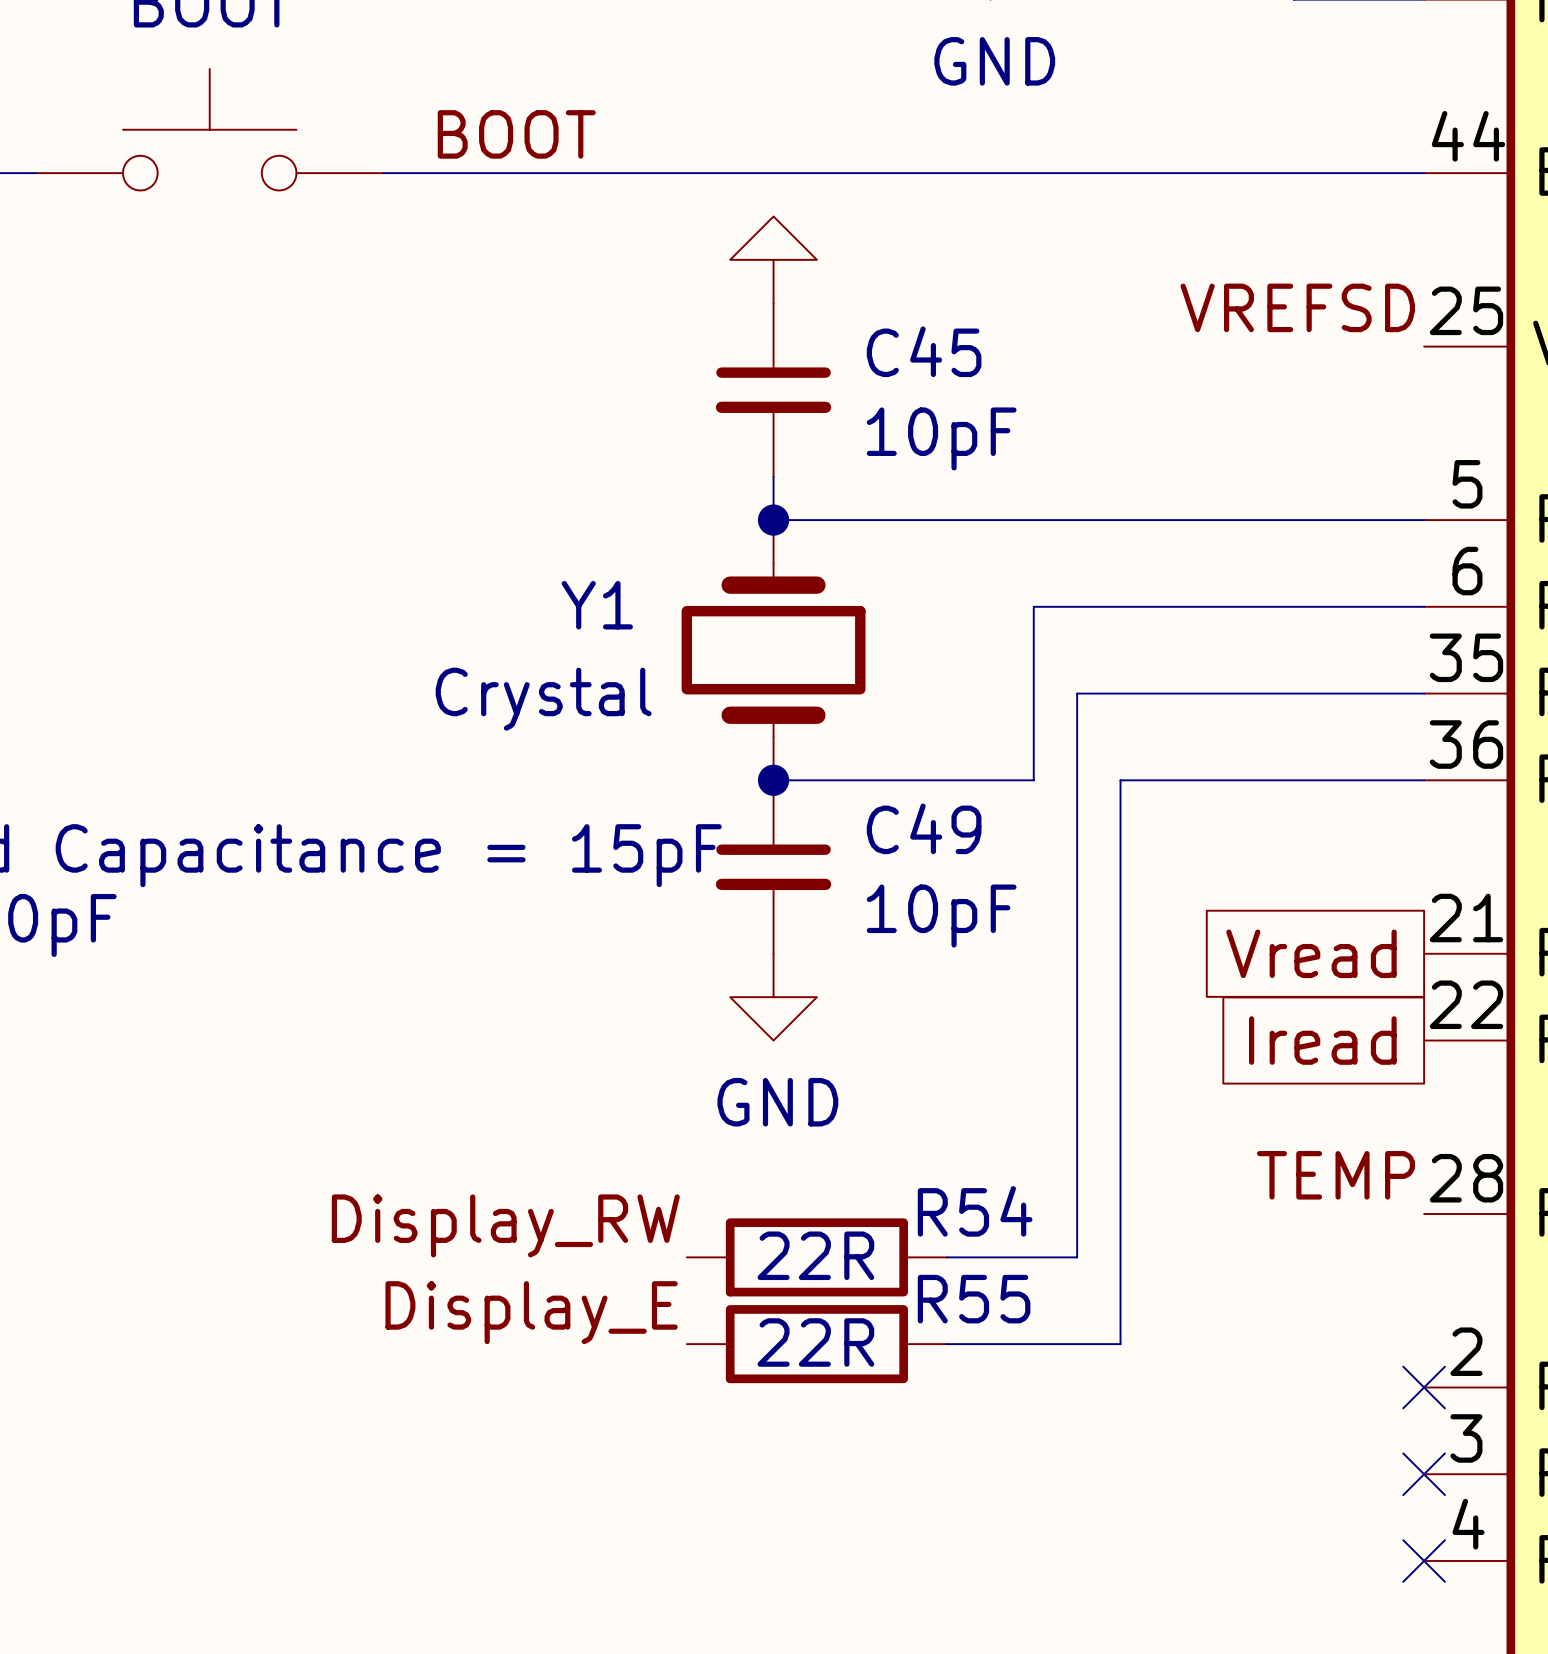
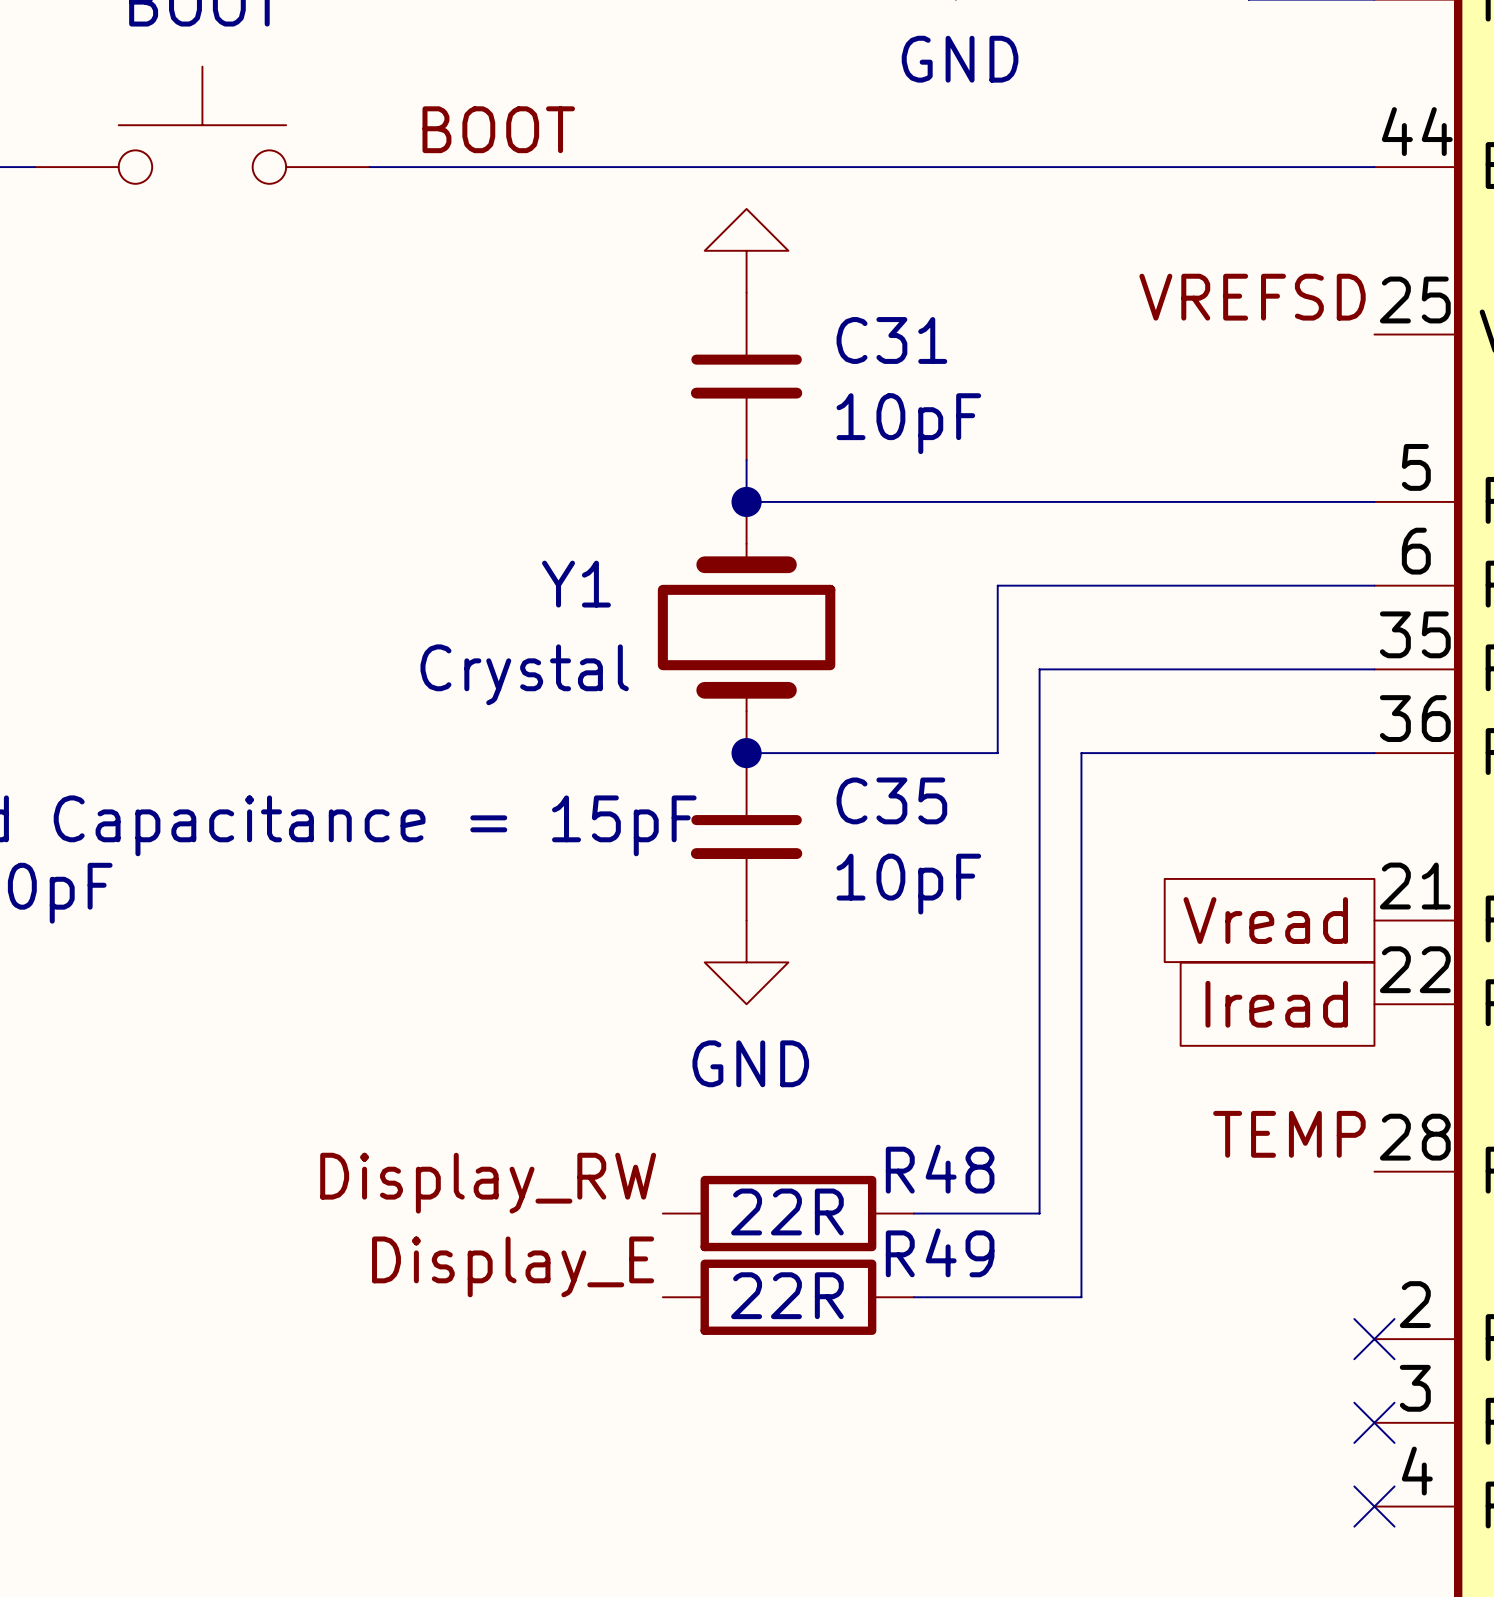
C45 name: C45 (924, 351) -> C31 (891, 340)
C49 name: C49 (924, 828) -> C35 (891, 800)
R54 name: R54 (975, 1211) -> R48 (940, 1169)
R55 name: R55 (974, 1299) -> R49 (940, 1252)

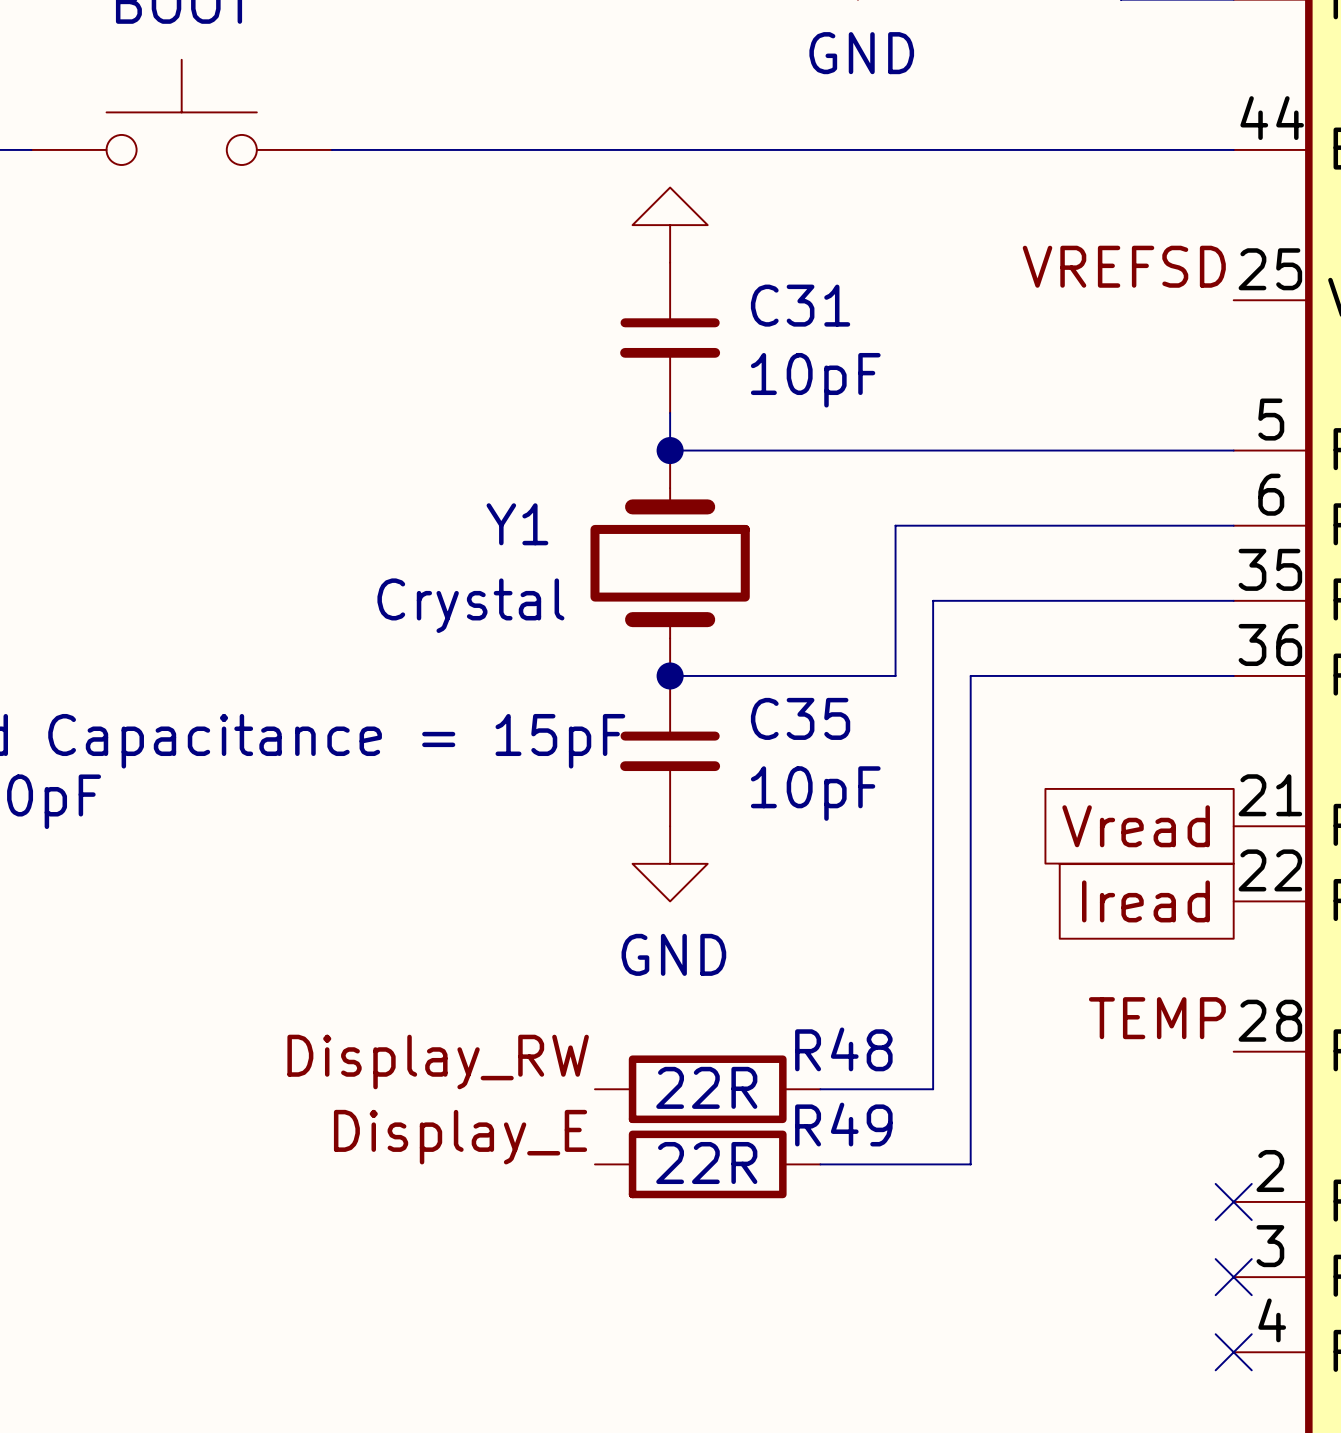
label: BOOT (498, 129) -> none

